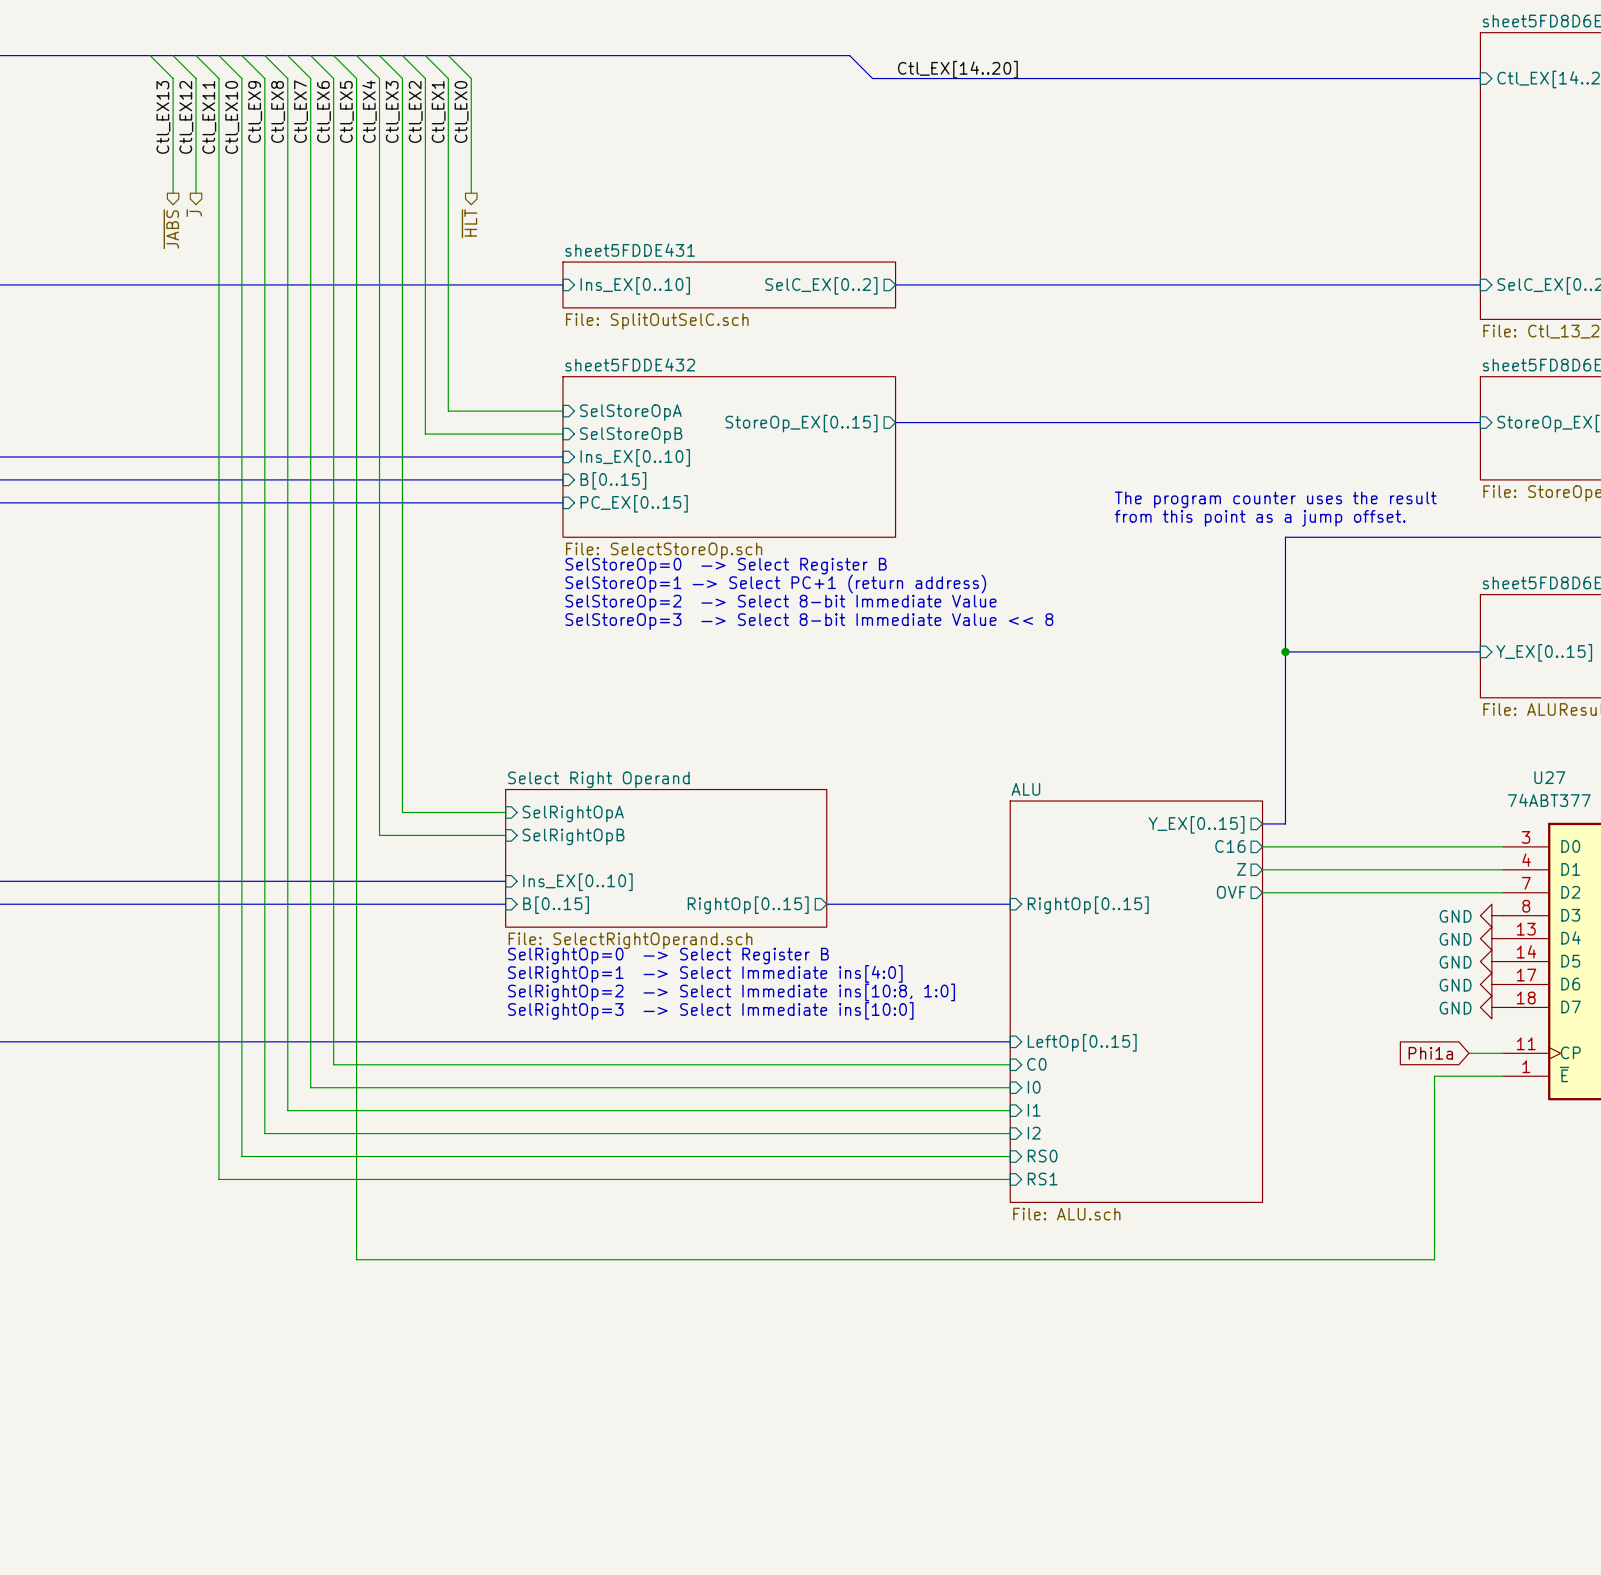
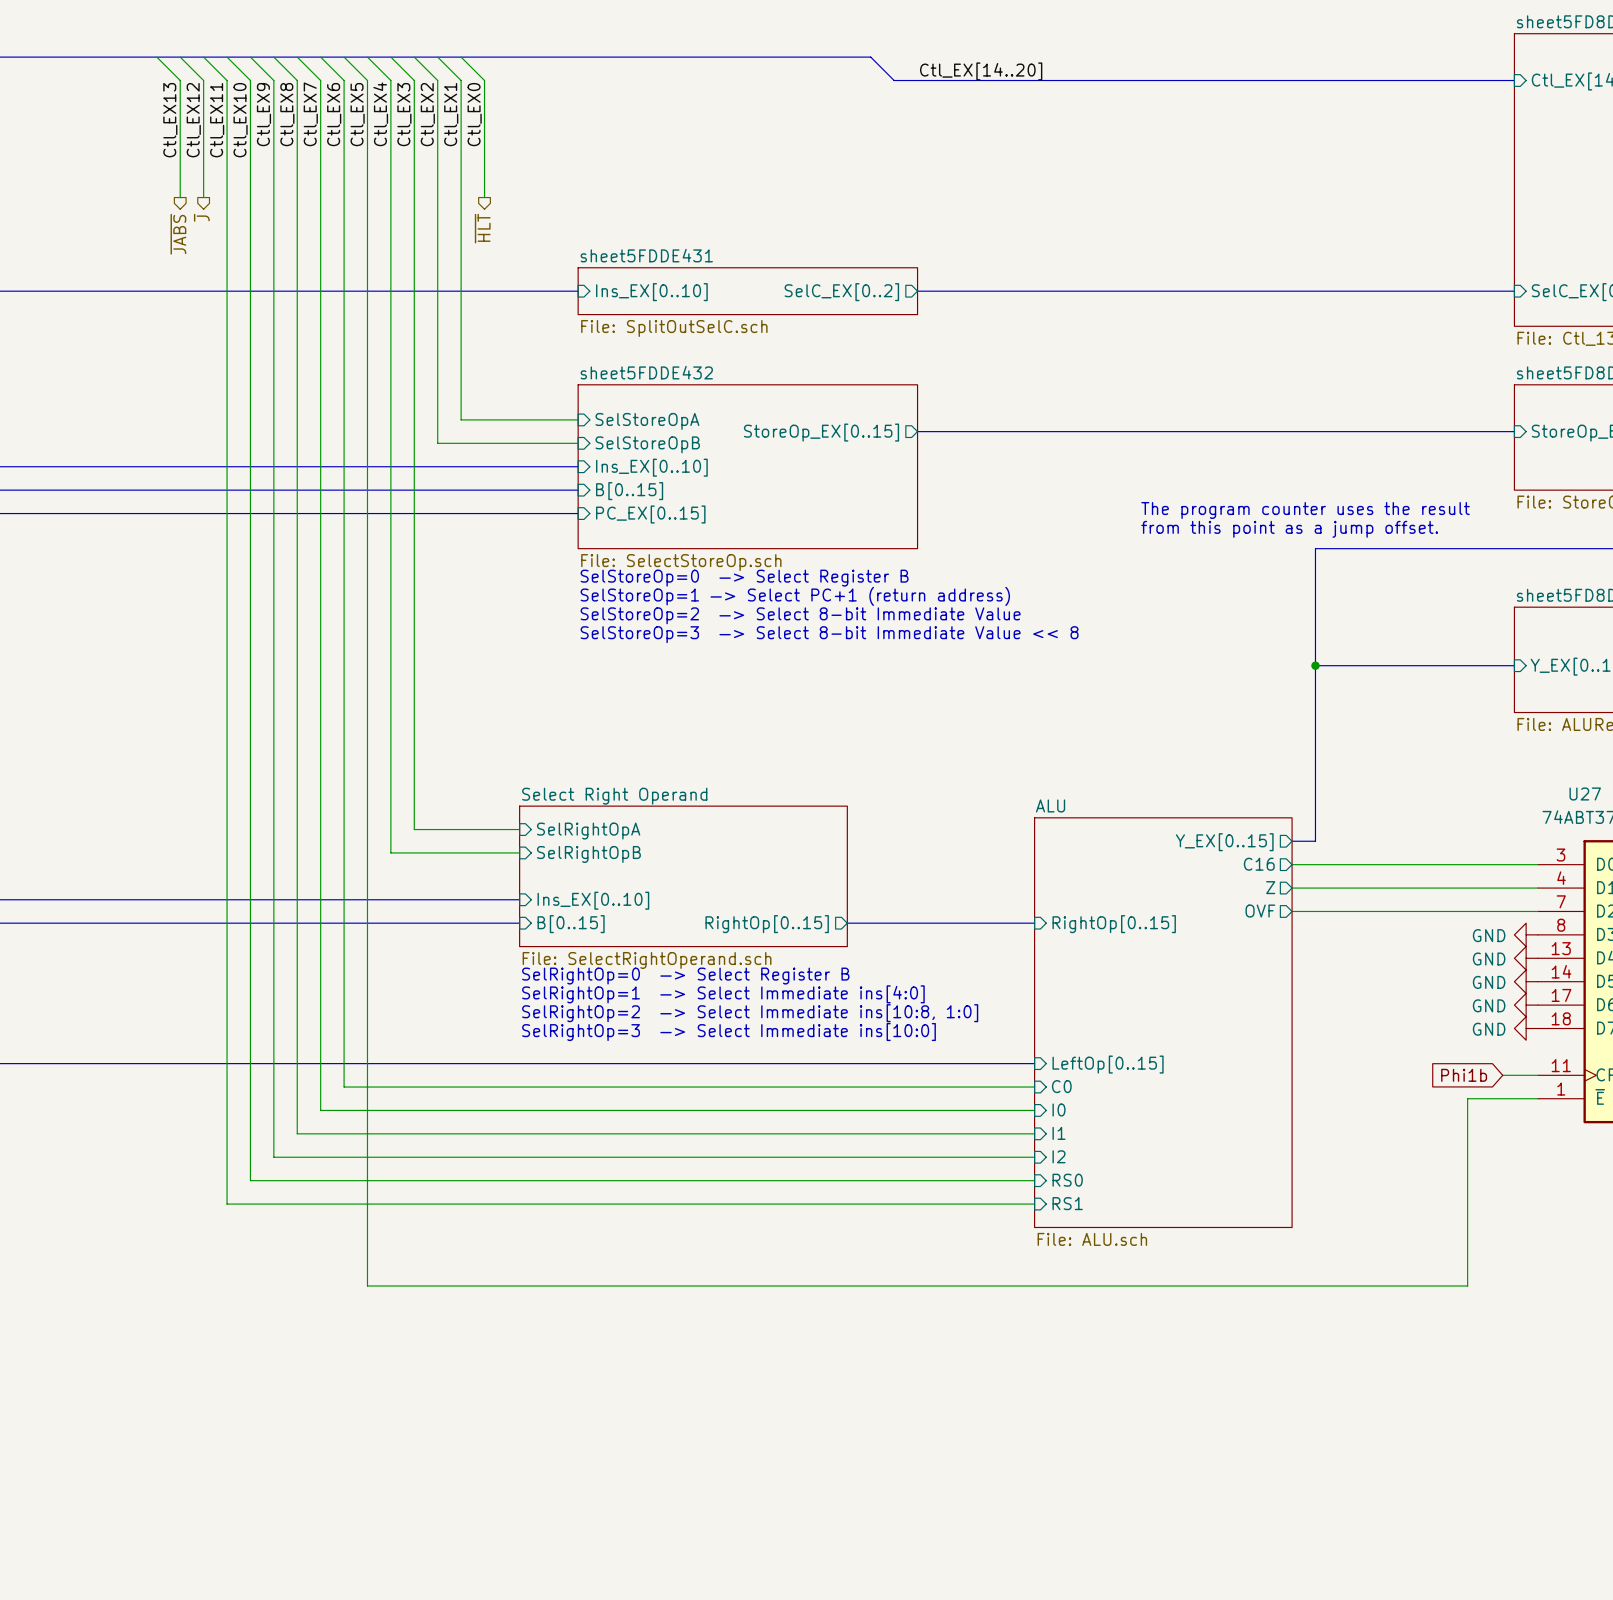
global label: Phi1a (1430, 1053) -> Phi1b (1464, 1075)

